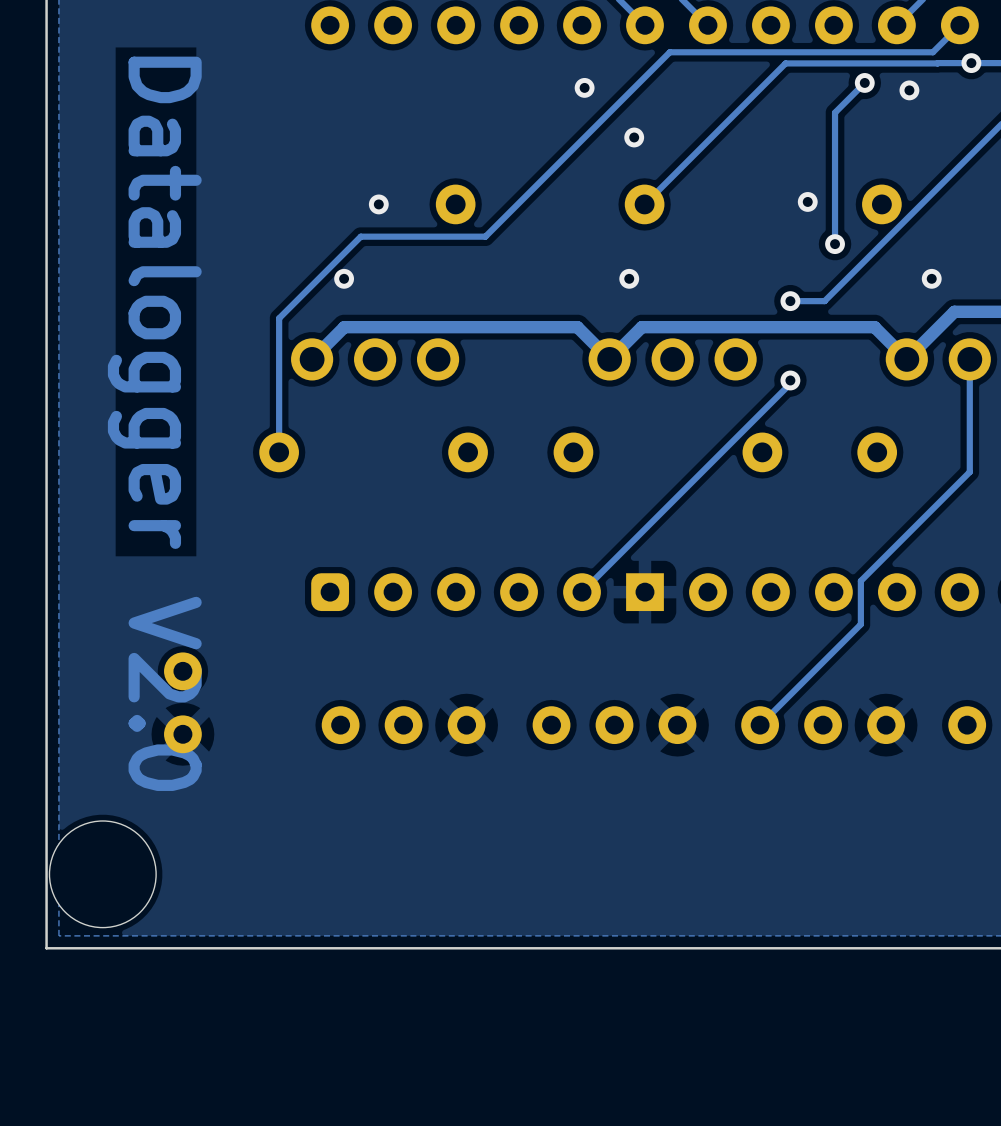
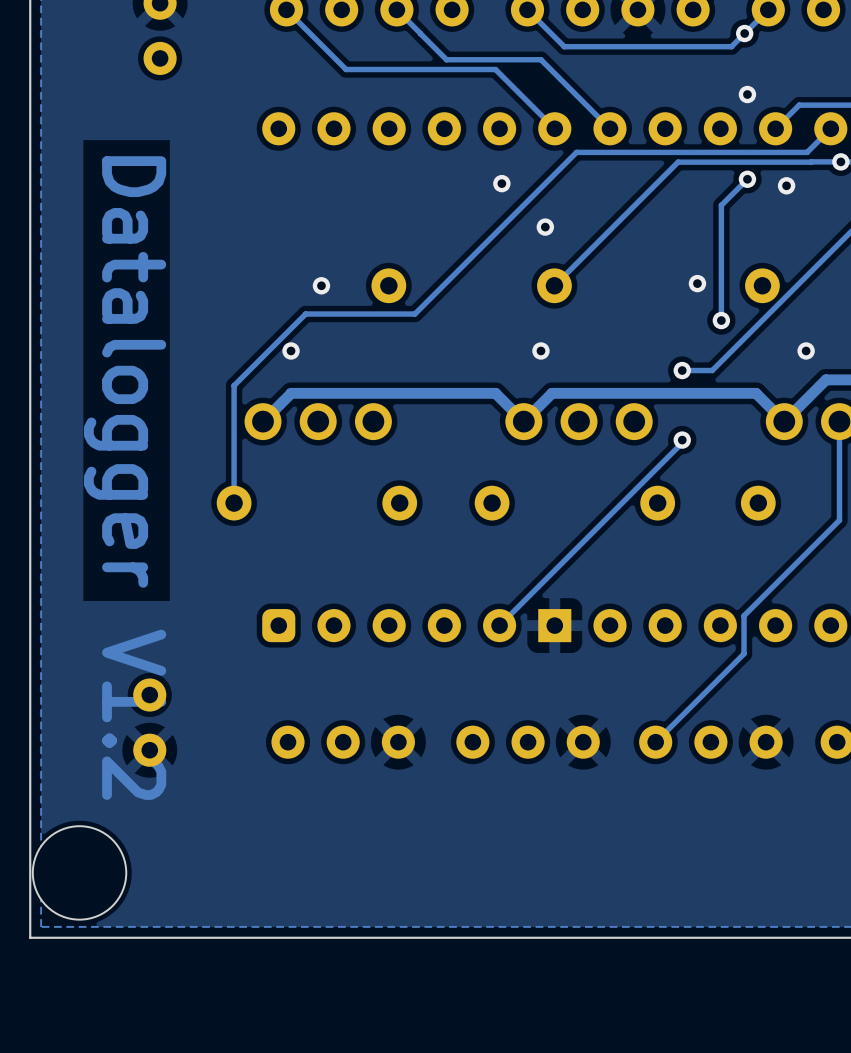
text: Datalogger V2.0 (154, 423) -> Datalogger V1.2 (125, 478)

